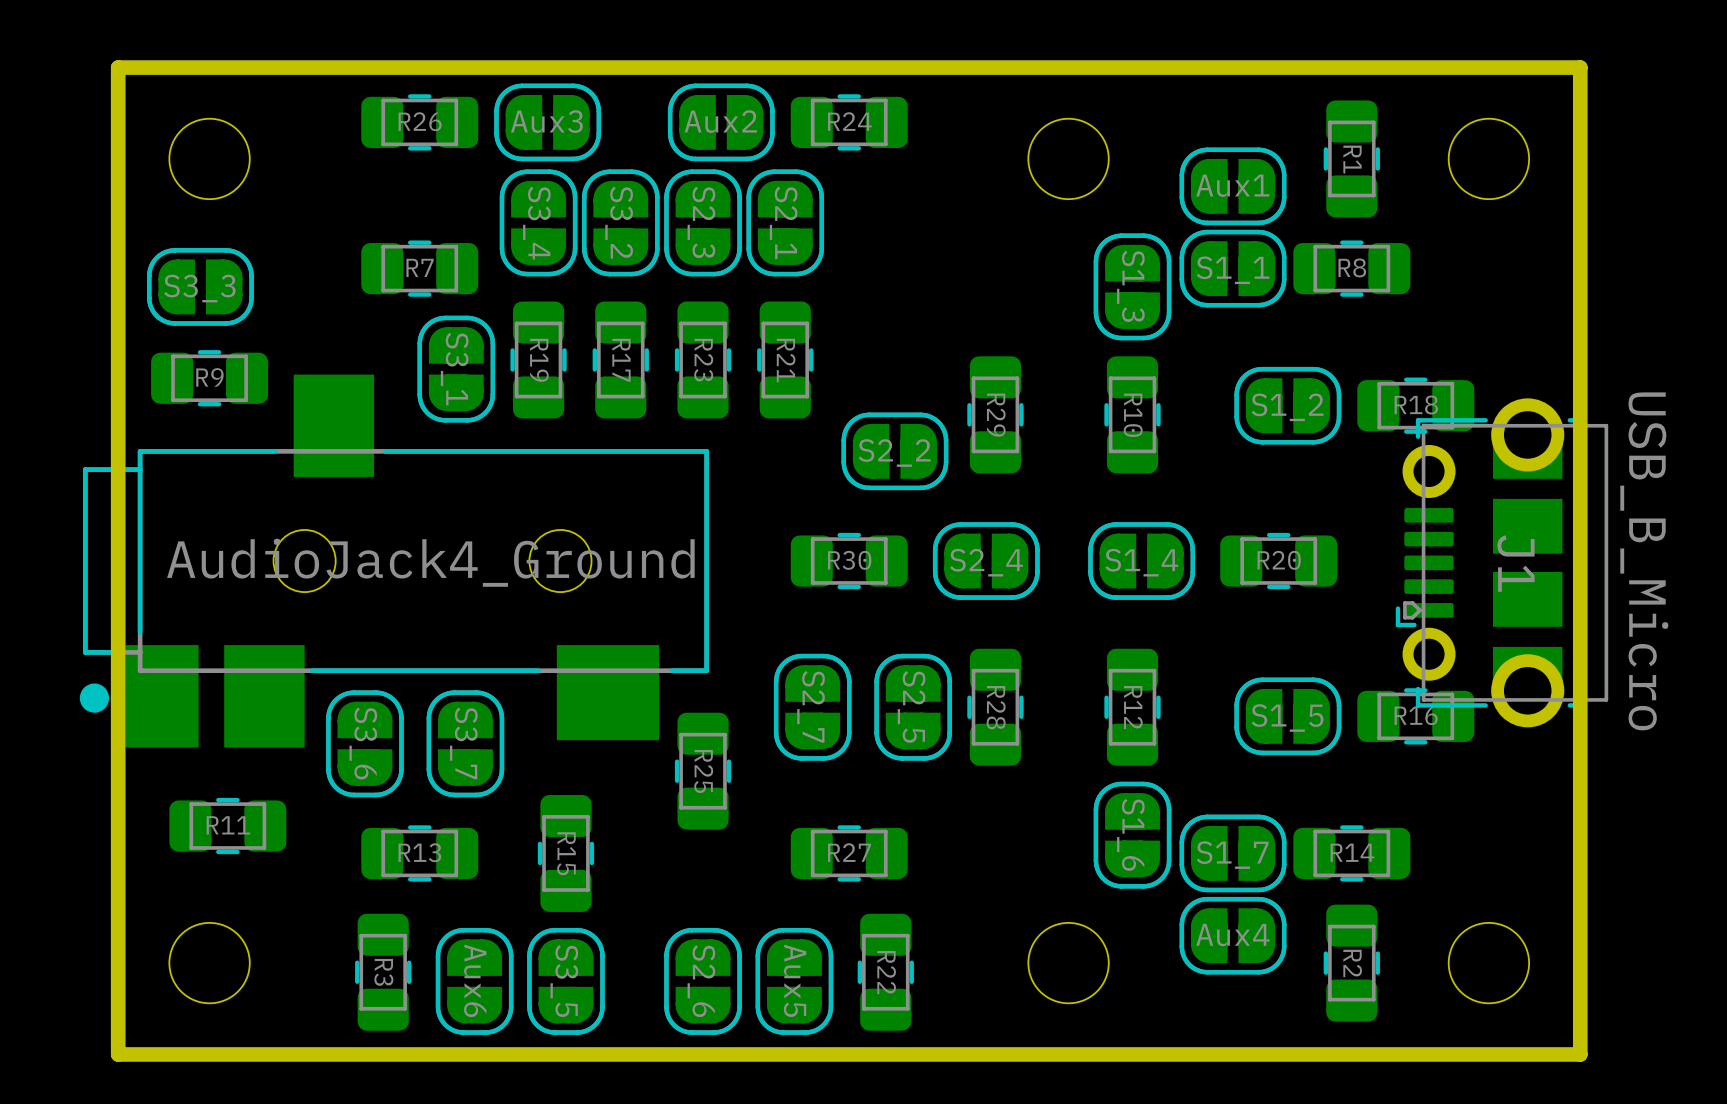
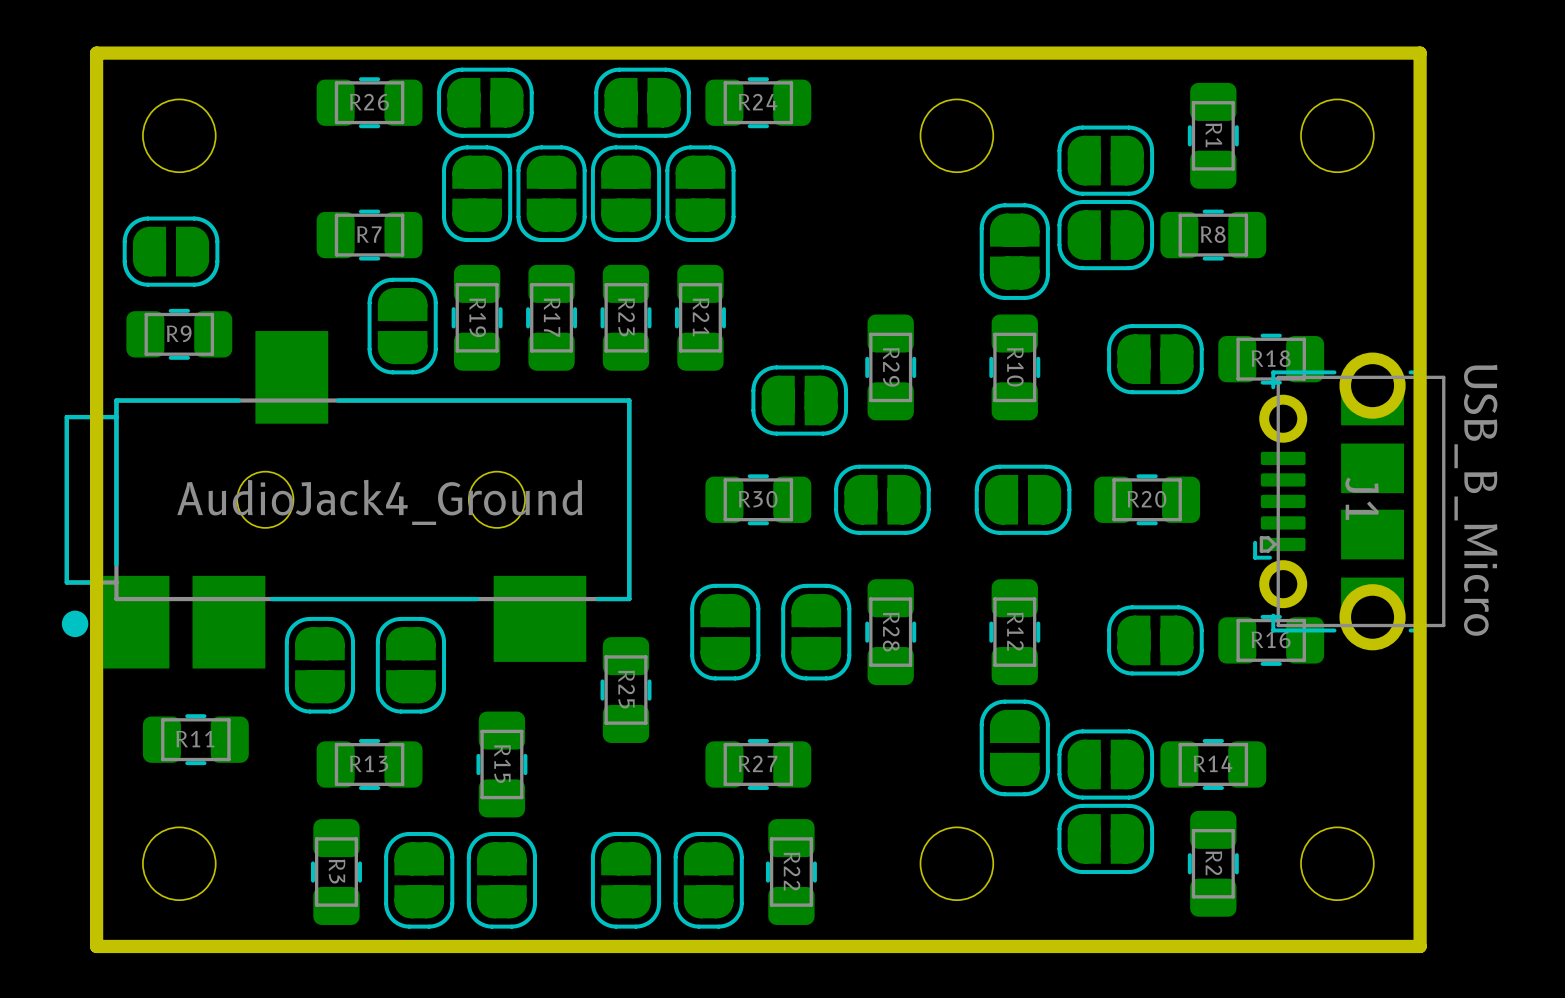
part footprint: [494, 83, 602, 162] -> [437, 67, 534, 138]
part footprint: [667, 83, 775, 162] -> [594, 67, 691, 138]
text: Aux3 (546, 121) -> none
text: Aux2 (720, 121) -> none
part footprint: [1179, 147, 1287, 226] -> [1057, 125, 1155, 196]
part footprint: [499, 169, 578, 277] -> [442, 145, 513, 243]
part footprint: [582, 169, 660, 277] -> [516, 145, 587, 243]
part footprint: [664, 169, 742, 277] -> [590, 145, 662, 243]
part footprint: [746, 169, 825, 277] -> [665, 145, 736, 243]
text: Aux1 (1232, 185) -> none
text: S3_2 (619, 222) -> none
text: S2_3 (701, 222) -> none
text: S2_1 (783, 222) -> none
text: S3_4 (536, 223) -> none
part footprint: [1179, 229, 1287, 308] -> [1057, 200, 1155, 271]
part footprint: [1093, 233, 1172, 341] -> [979, 203, 1050, 300]
part footprint: [147, 248, 254, 326] -> [122, 216, 220, 287]
text: S1_1 (1233, 270) -> none
text: S1_3 (1130, 286) -> none
text: S3_3 (199, 288) -> none
part footprint: [417, 315, 496, 423] -> [367, 277, 438, 375]
part footprint: [1234, 366, 1342, 445] -> [1107, 324, 1204, 395]
text: S3_1 (454, 369) -> none
text: S1_2 (1287, 407) -> none
part footprint: [841, 412, 949, 491] -> [751, 365, 849, 436]
text: S2_2 (894, 453) -> none
part footprint: [932, 522, 1040, 600] -> [834, 464, 931, 535]
part footprint: [1088, 522, 1196, 600] -> [974, 464, 1072, 535]
text: S2_4 (986, 562) -> none
text: S1_4 (1141, 562) -> none
part footprint: [773, 653, 852, 761] -> [690, 583, 761, 681]
part footprint: [874, 653, 952, 761] -> [781, 583, 852, 681]
part footprint: [1234, 677, 1342, 756] -> [1107, 605, 1204, 676]
part footprint: [326, 690, 404, 798] -> [284, 616, 356, 714]
part footprint: [426, 690, 505, 798] -> [375, 616, 447, 714]
text: S2_7 (811, 706) -> none
text: S2_5 (911, 706) -> none
text: S1_5 (1287, 718) -> none
text: S3_6 (363, 743) -> none
text: S3_7 (463, 743) -> none
part footprint: [1093, 781, 1172, 889] -> [979, 699, 1050, 797]
part footprint: [1179, 814, 1287, 893] -> [1057, 729, 1155, 800]
text: S1_6 (1130, 834) -> none
text: S1_7 (1232, 855) -> none
part footprint: [1179, 896, 1287, 975] -> [1057, 803, 1155, 875]
part footprint: [435, 928, 514, 1035] -> [384, 831, 455, 929]
part footprint: [527, 928, 605, 1035] -> [466, 831, 538, 929]
part footprint: [664, 928, 742, 1035] -> [590, 831, 662, 929]
part footprint: [755, 928, 834, 1035] -> [673, 831, 744, 929]
text: Aux4 (1232, 935) -> none
text: Aux6 (475, 980) -> none
text: Aux5 (795, 980) -> none
text: S3_5 (564, 981) -> none
text: S2_6 (701, 981) -> none

